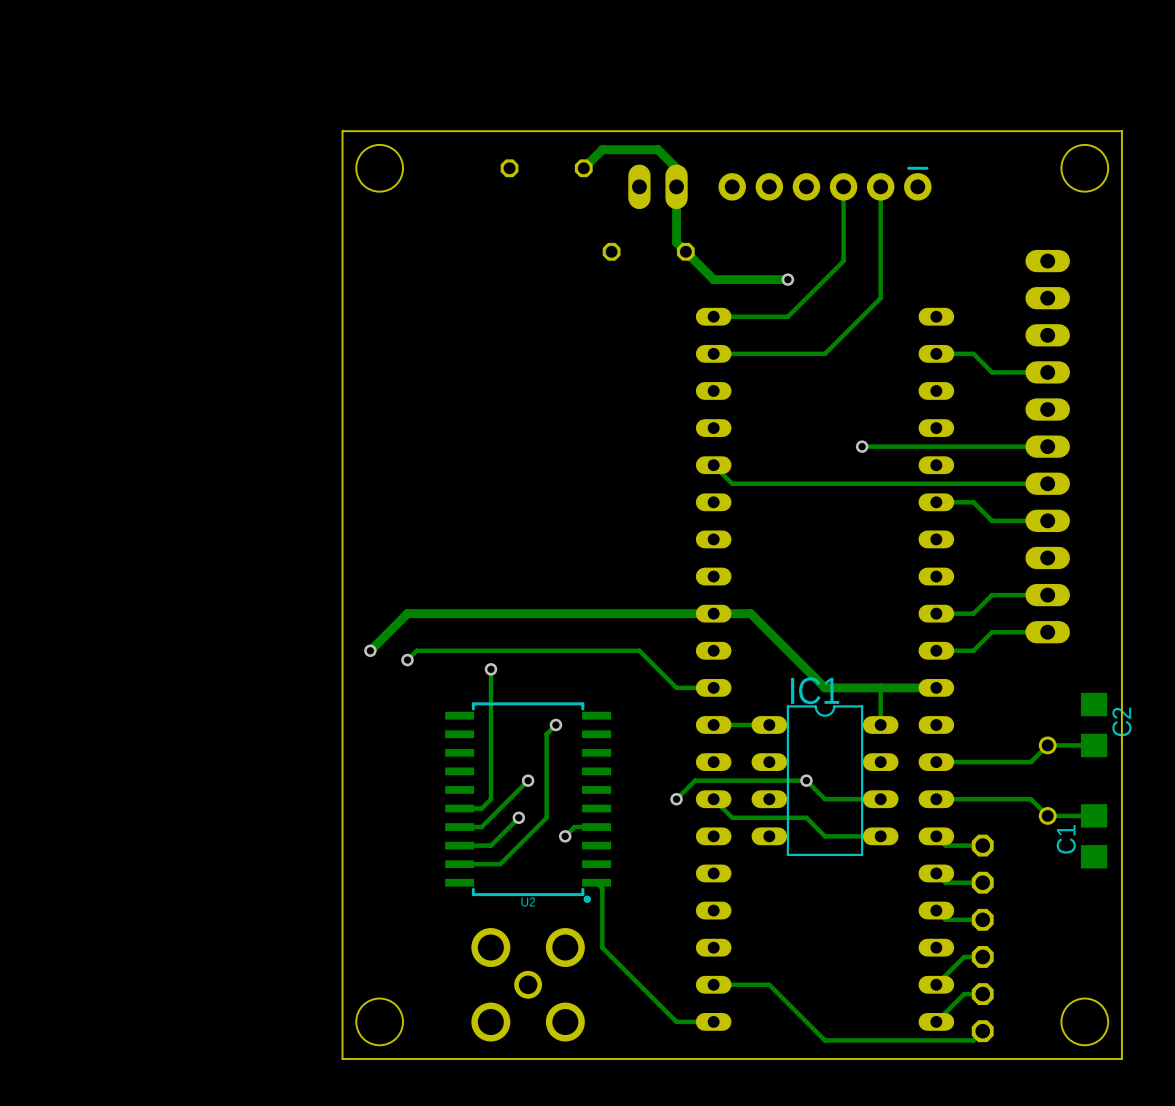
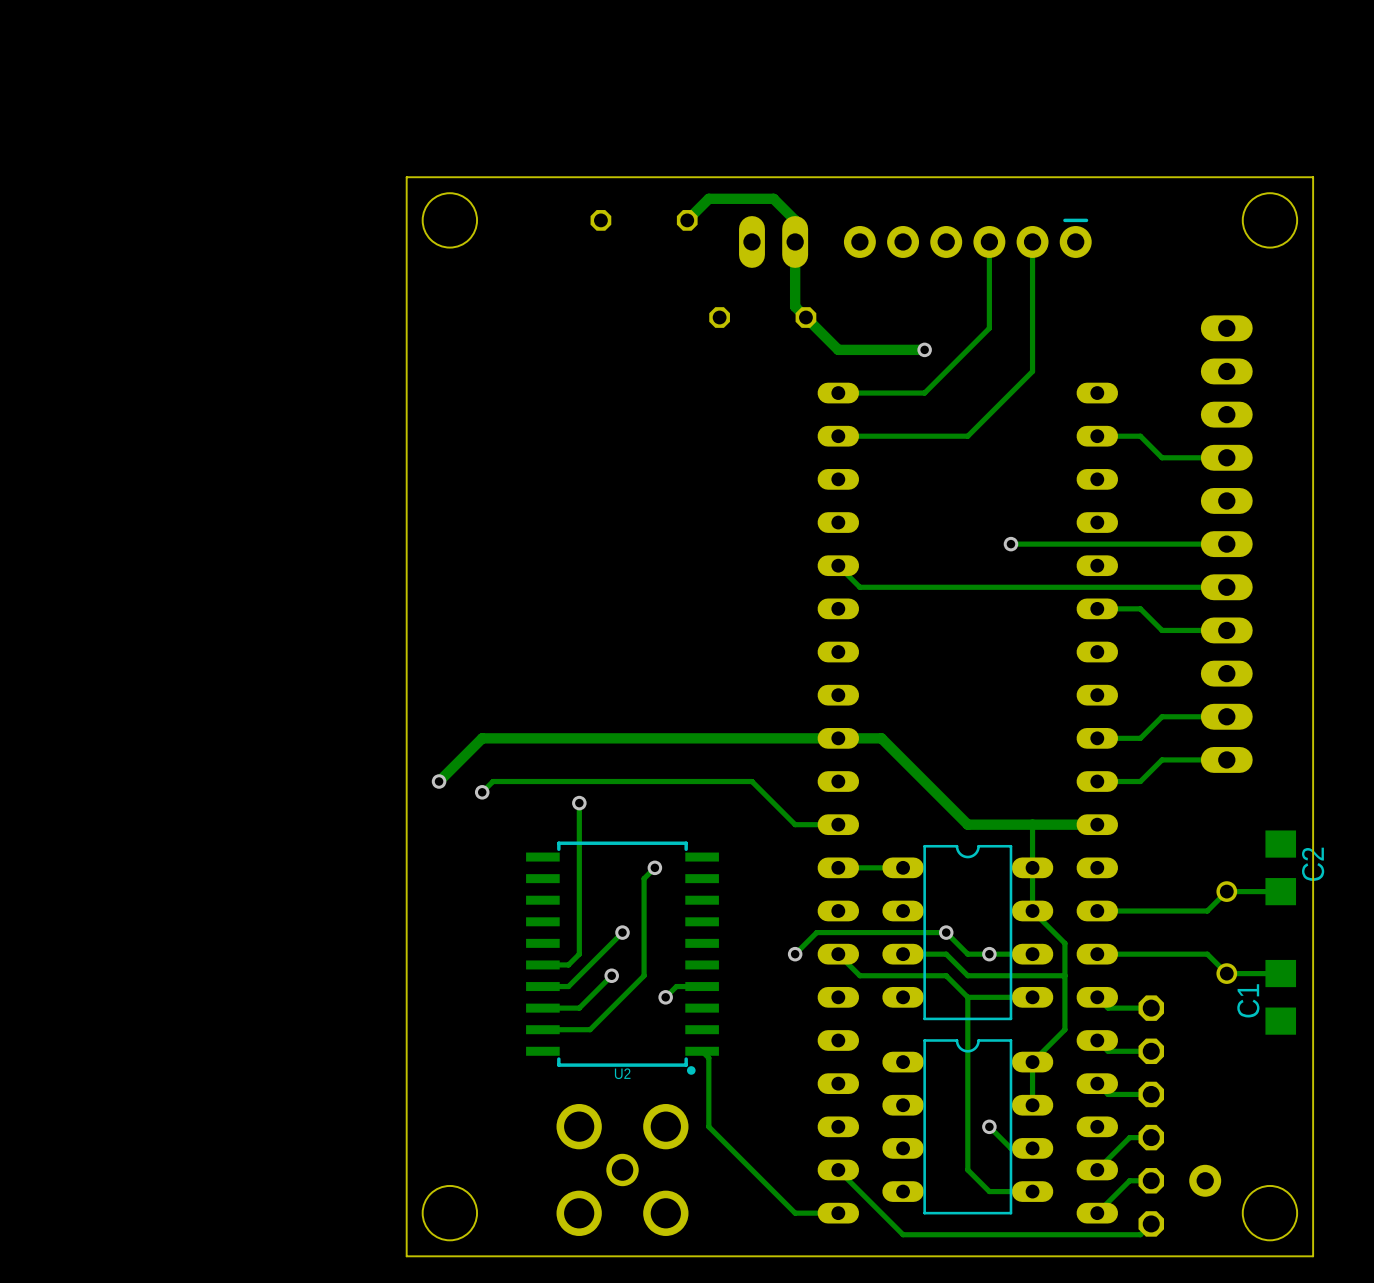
IC1 name: IC1 (815, 690) -> none
track: none -> (1032, 867) (1032, 911) (1064, 943) (1064, 1029) (1032, 1062) (1032, 1105)
track: none -> (903, 954) (946, 954) (967, 975) (1064, 975)
via: none -> (989, 954)
track: none -> (967, 997) (967, 1169) (989, 1191) (1032, 1191)
part: none -> (967, 1126)
track: none -> (989, 1126) (1010, 1148) (1032, 1148)
via: none -> (989, 1126)
track: (713, 984) (769, 984) (825, 1040) -> (838, 1169) (903, 1234) (967, 1234)
part: none -> (1205, 1180)

